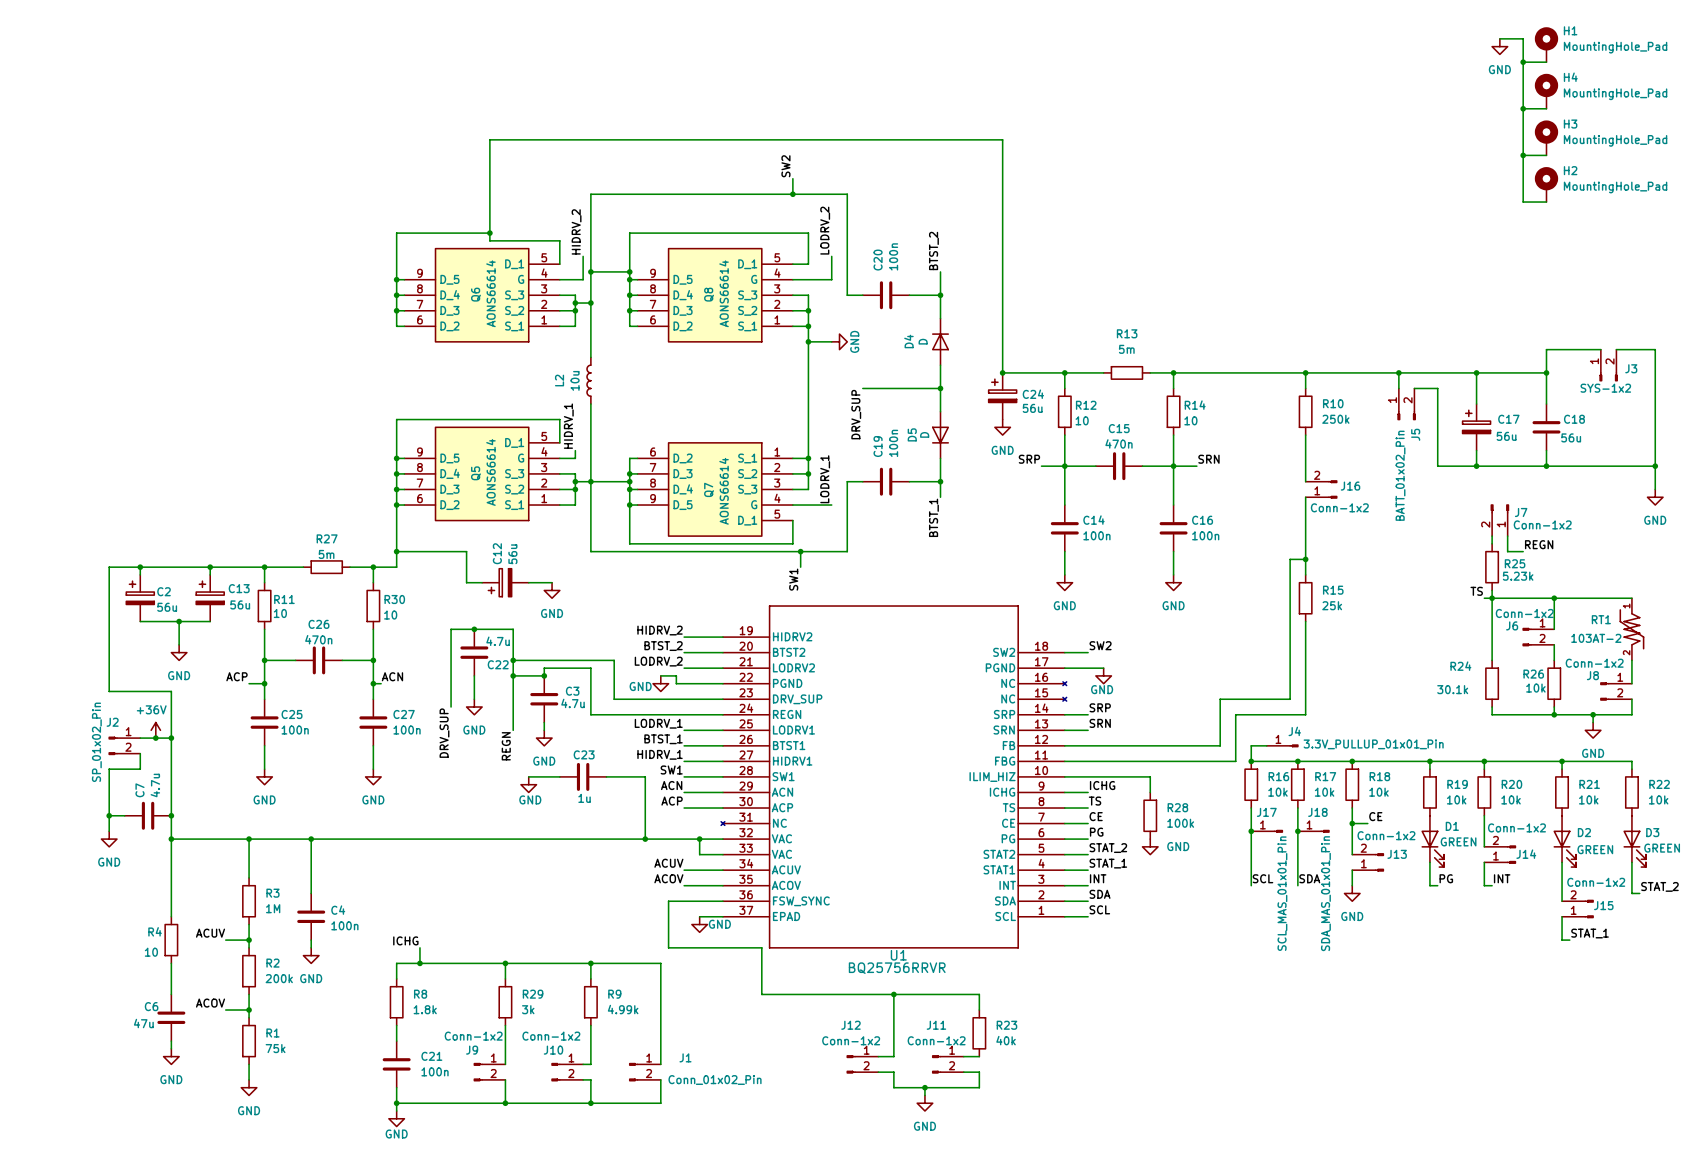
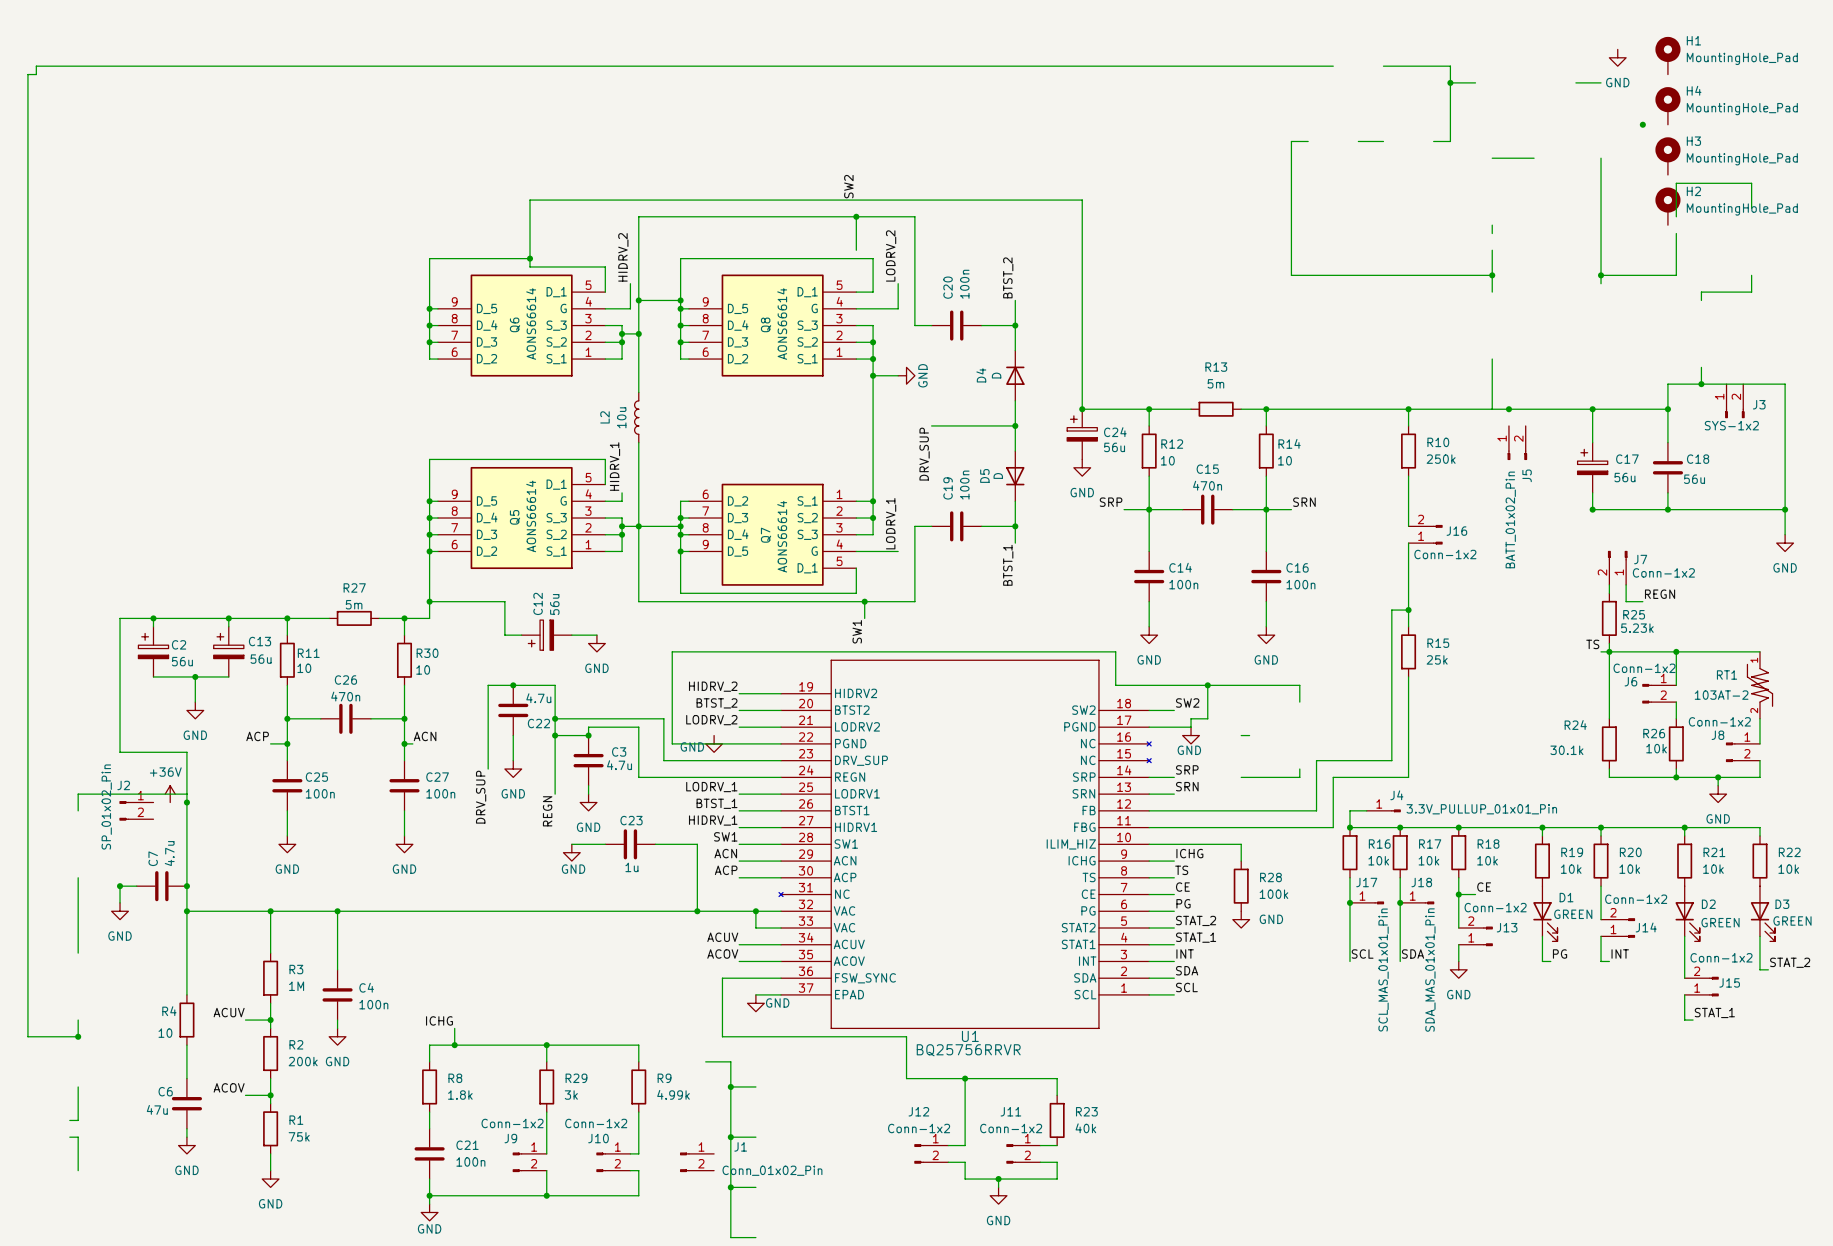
wire: (1499, 38) (1523, 38) (1523, 202) (1546, 202) -> none
wire: none -> (1333, 66) (36, 66) (36, 74) (27, 74) (27, 1036) (78, 1036) (78, 1020)
wire: none -> (1383, 66) (1450, 66) (1450, 141) (1433, 141)
wire: (1523, 62) (1546, 62) -> (1575, 82) (1601, 82)
junction: (1523, 62) -> none
wire: none -> (1450, 82) (1475, 82)
junction: none -> (1450, 82)
wire: (1523, 108) (1546, 108) -> none
wire: none -> (1308, 141) (1291, 141) (1291, 275) (1492, 275)
wire: none -> (1358, 141) (1383, 141)
wire: none -> (1492, 158) (1534, 158)
wire: none -> (1601, 158) (1601, 283)
wire: (1523, 155) (1546, 155) -> none
junction: (1523, 155) -> none
wire: (489, 178) (489, 139) (1002, 139) (1002, 178) -> (530, 200) (1082, 200)
wire: (792, 178) (792, 194) -> (856, 250) (856, 216)
wire: none -> (1751, 208) (1751, 183) (1676, 183) (1676, 216)
wire: none -> (1492, 225) (1492, 233)
wire: none -> (1676, 233) (1676, 275) (1601, 275)
wire: none -> (1492, 250) (1492, 292)
junction: none -> (1492, 275)
junction: none -> (1601, 275)
wire: none -> (1751, 275) (1751, 292) (1701, 292) (1701, 300)
wire: none -> (1492, 359) (1492, 409)
wire: none -> (1701, 367) (1701, 384)
junction: none -> (1701, 384)
wire: none -> (1726, 384) (1743, 384)
wire: (1398, 372) (1398, 388) -> none
wire: (1414, 388) (1437, 388) (1437, 466) (1476, 466) -> none
wire: none -> (1207, 685) (1207, 718) (1191, 718) (1191, 727)
junction: none -> (1207, 685)
wire: (660, 675) (676, 675) (676, 683) -> (1299, 702) (1299, 685) (1115, 685) (1115, 651) (672, 651) (672, 743) (730, 743)
wire: none -> (1241, 735) (1249, 735)
wire: none -> (1299, 769) (1299, 777) (1241, 777)
wire: none -> (186, 794) (78, 794) (78, 810)
wire: (140, 738) (171, 738) -> none
junction: (155, 738) -> none
wire: (140, 753) (140, 769) (109, 769) (109, 815) -> none
wire: none -> (78, 877) (78, 953)
wire: (668, 947) (761, 947) (761, 994) (839, 994) -> (722, 1028) (722, 1036) (906, 1036) (906, 1078)
junction: none -> (78, 1036)
wire: (590, 963) (660, 963) (660, 1064) -> none
junction: (590, 963) -> none
wire: none -> (705, 1061) (730, 1061) (730, 1237) (755, 1237)
wire: none -> (78, 1086) (78, 1120) (69, 1120)
wire: none -> (730, 1086) (755, 1086)
junction: none -> (730, 1086)
wire: none -> (69, 1137) (78, 1137) (78, 1170)
wire: none -> (730, 1137) (755, 1137)
junction: none -> (730, 1137)
wire: (660, 1079) (660, 1103) (590, 1103) -> none
wire: none -> (730, 1187) (755, 1187)
junction: none -> (730, 1187)
junction: (590, 1103) -> none

